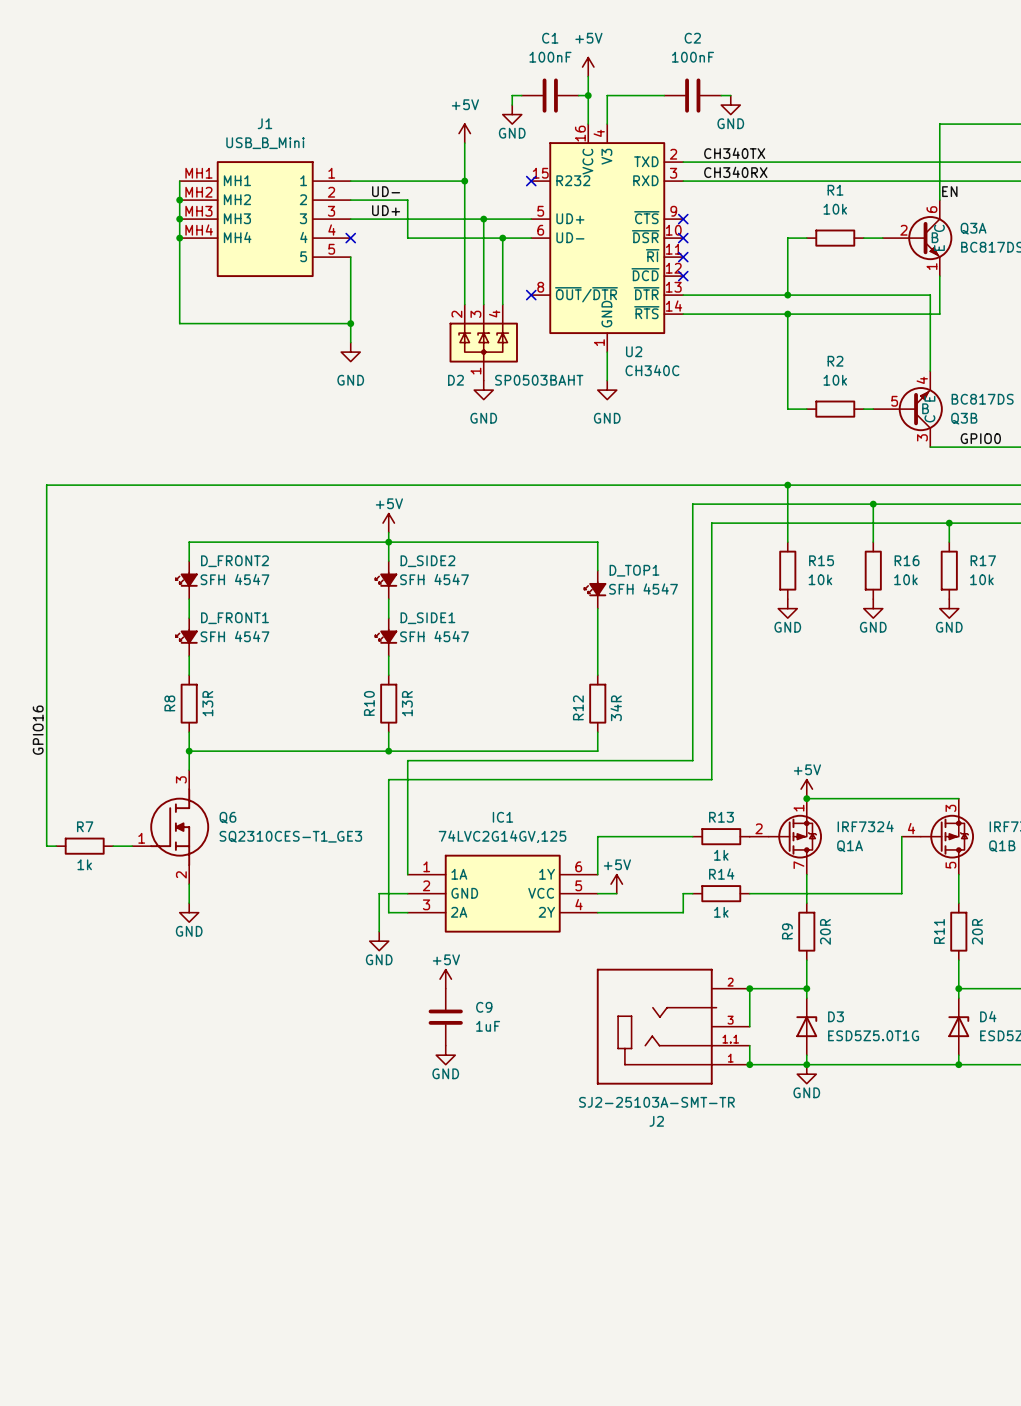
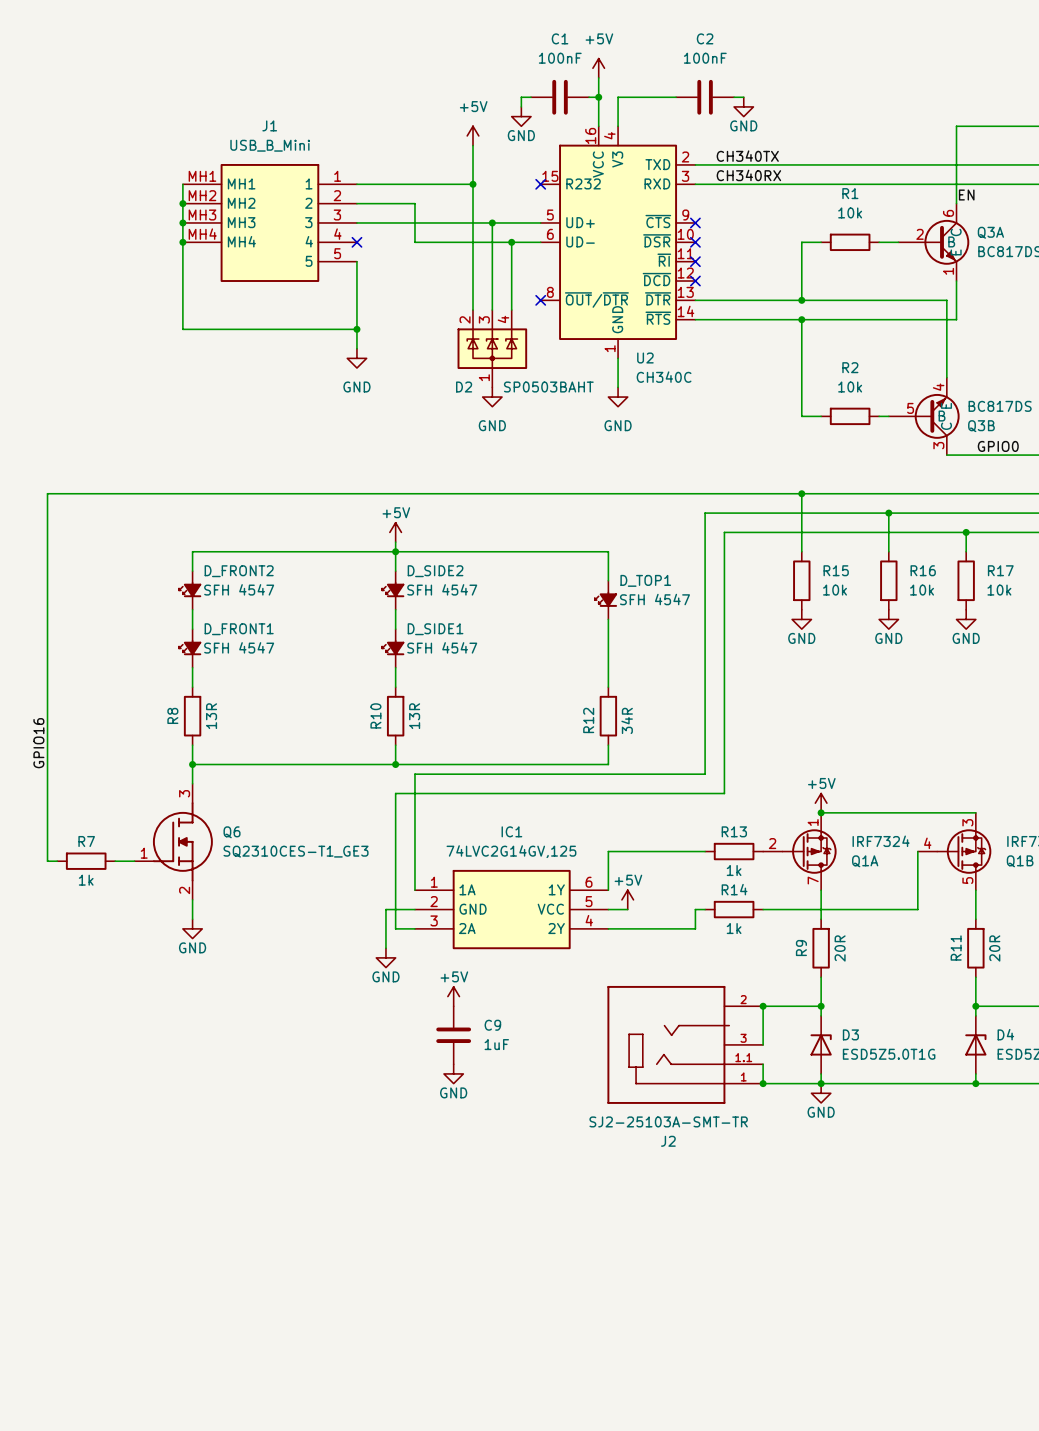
label: UD- (386, 191) -> none
label: UD+ (386, 210) -> none

